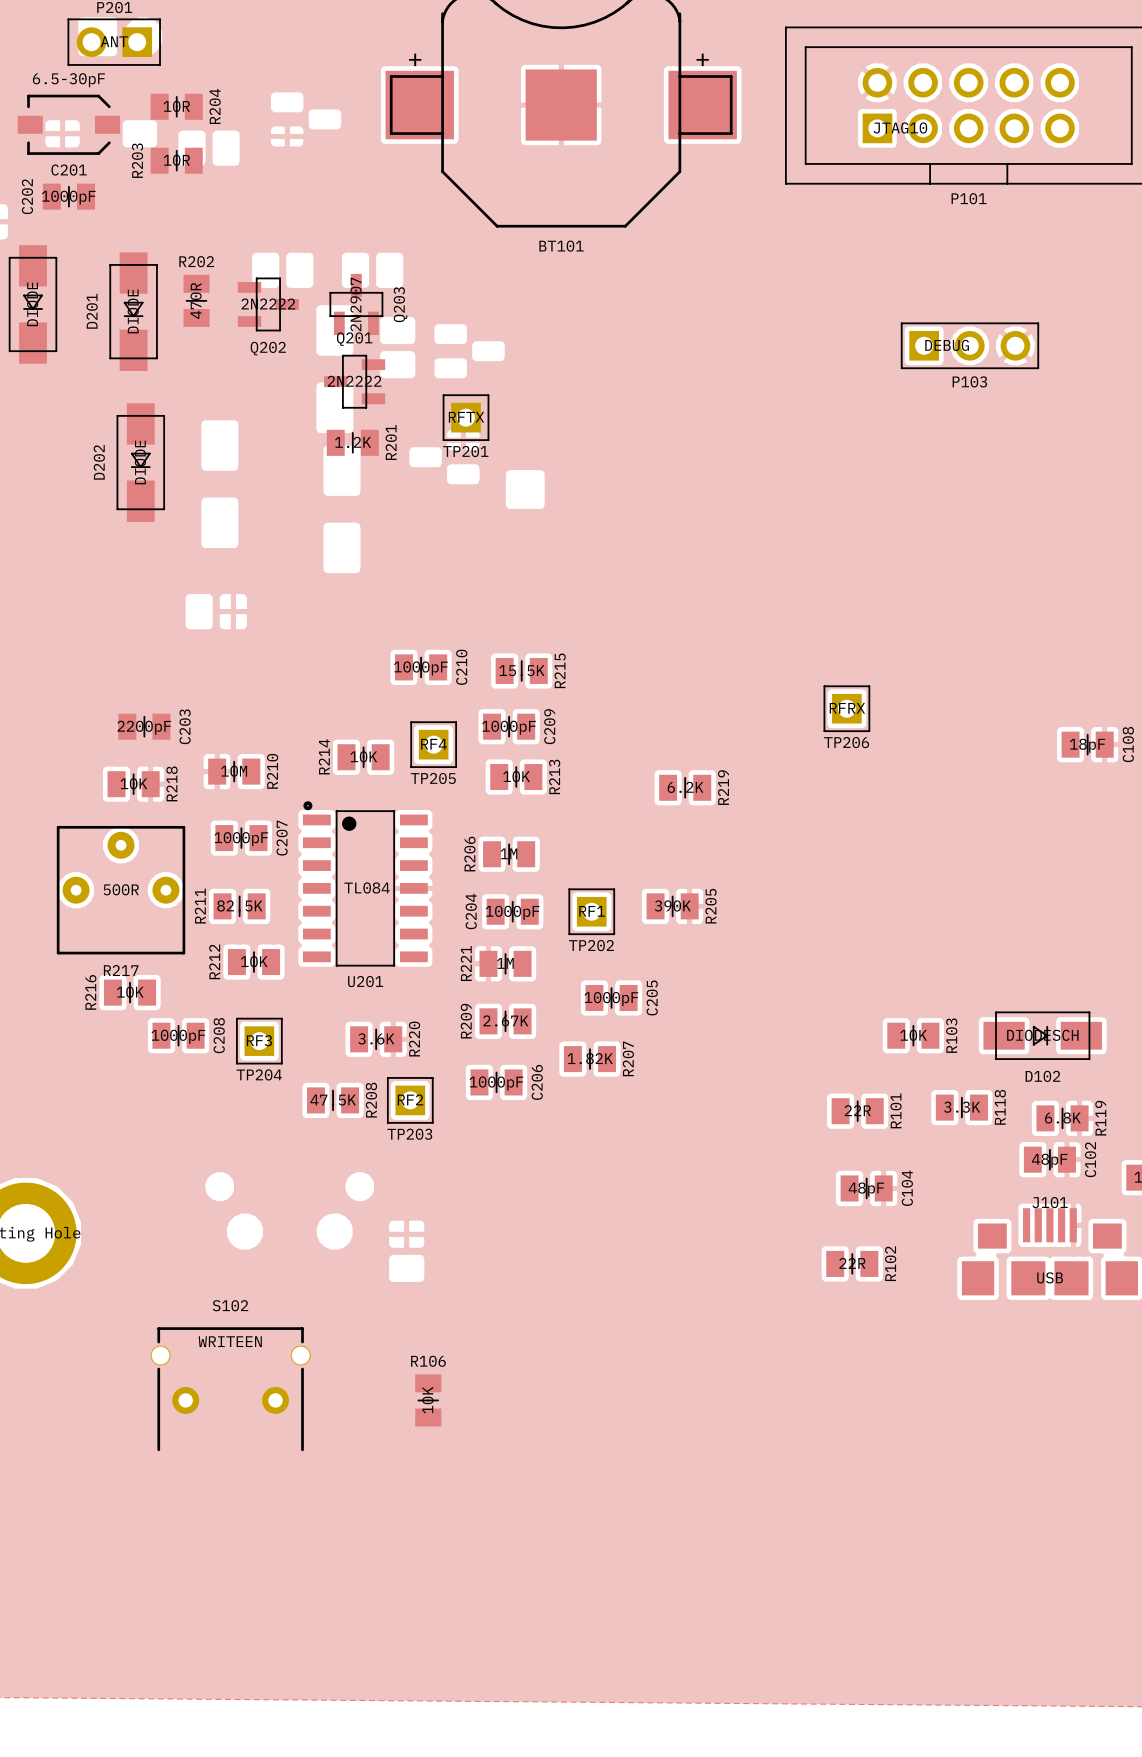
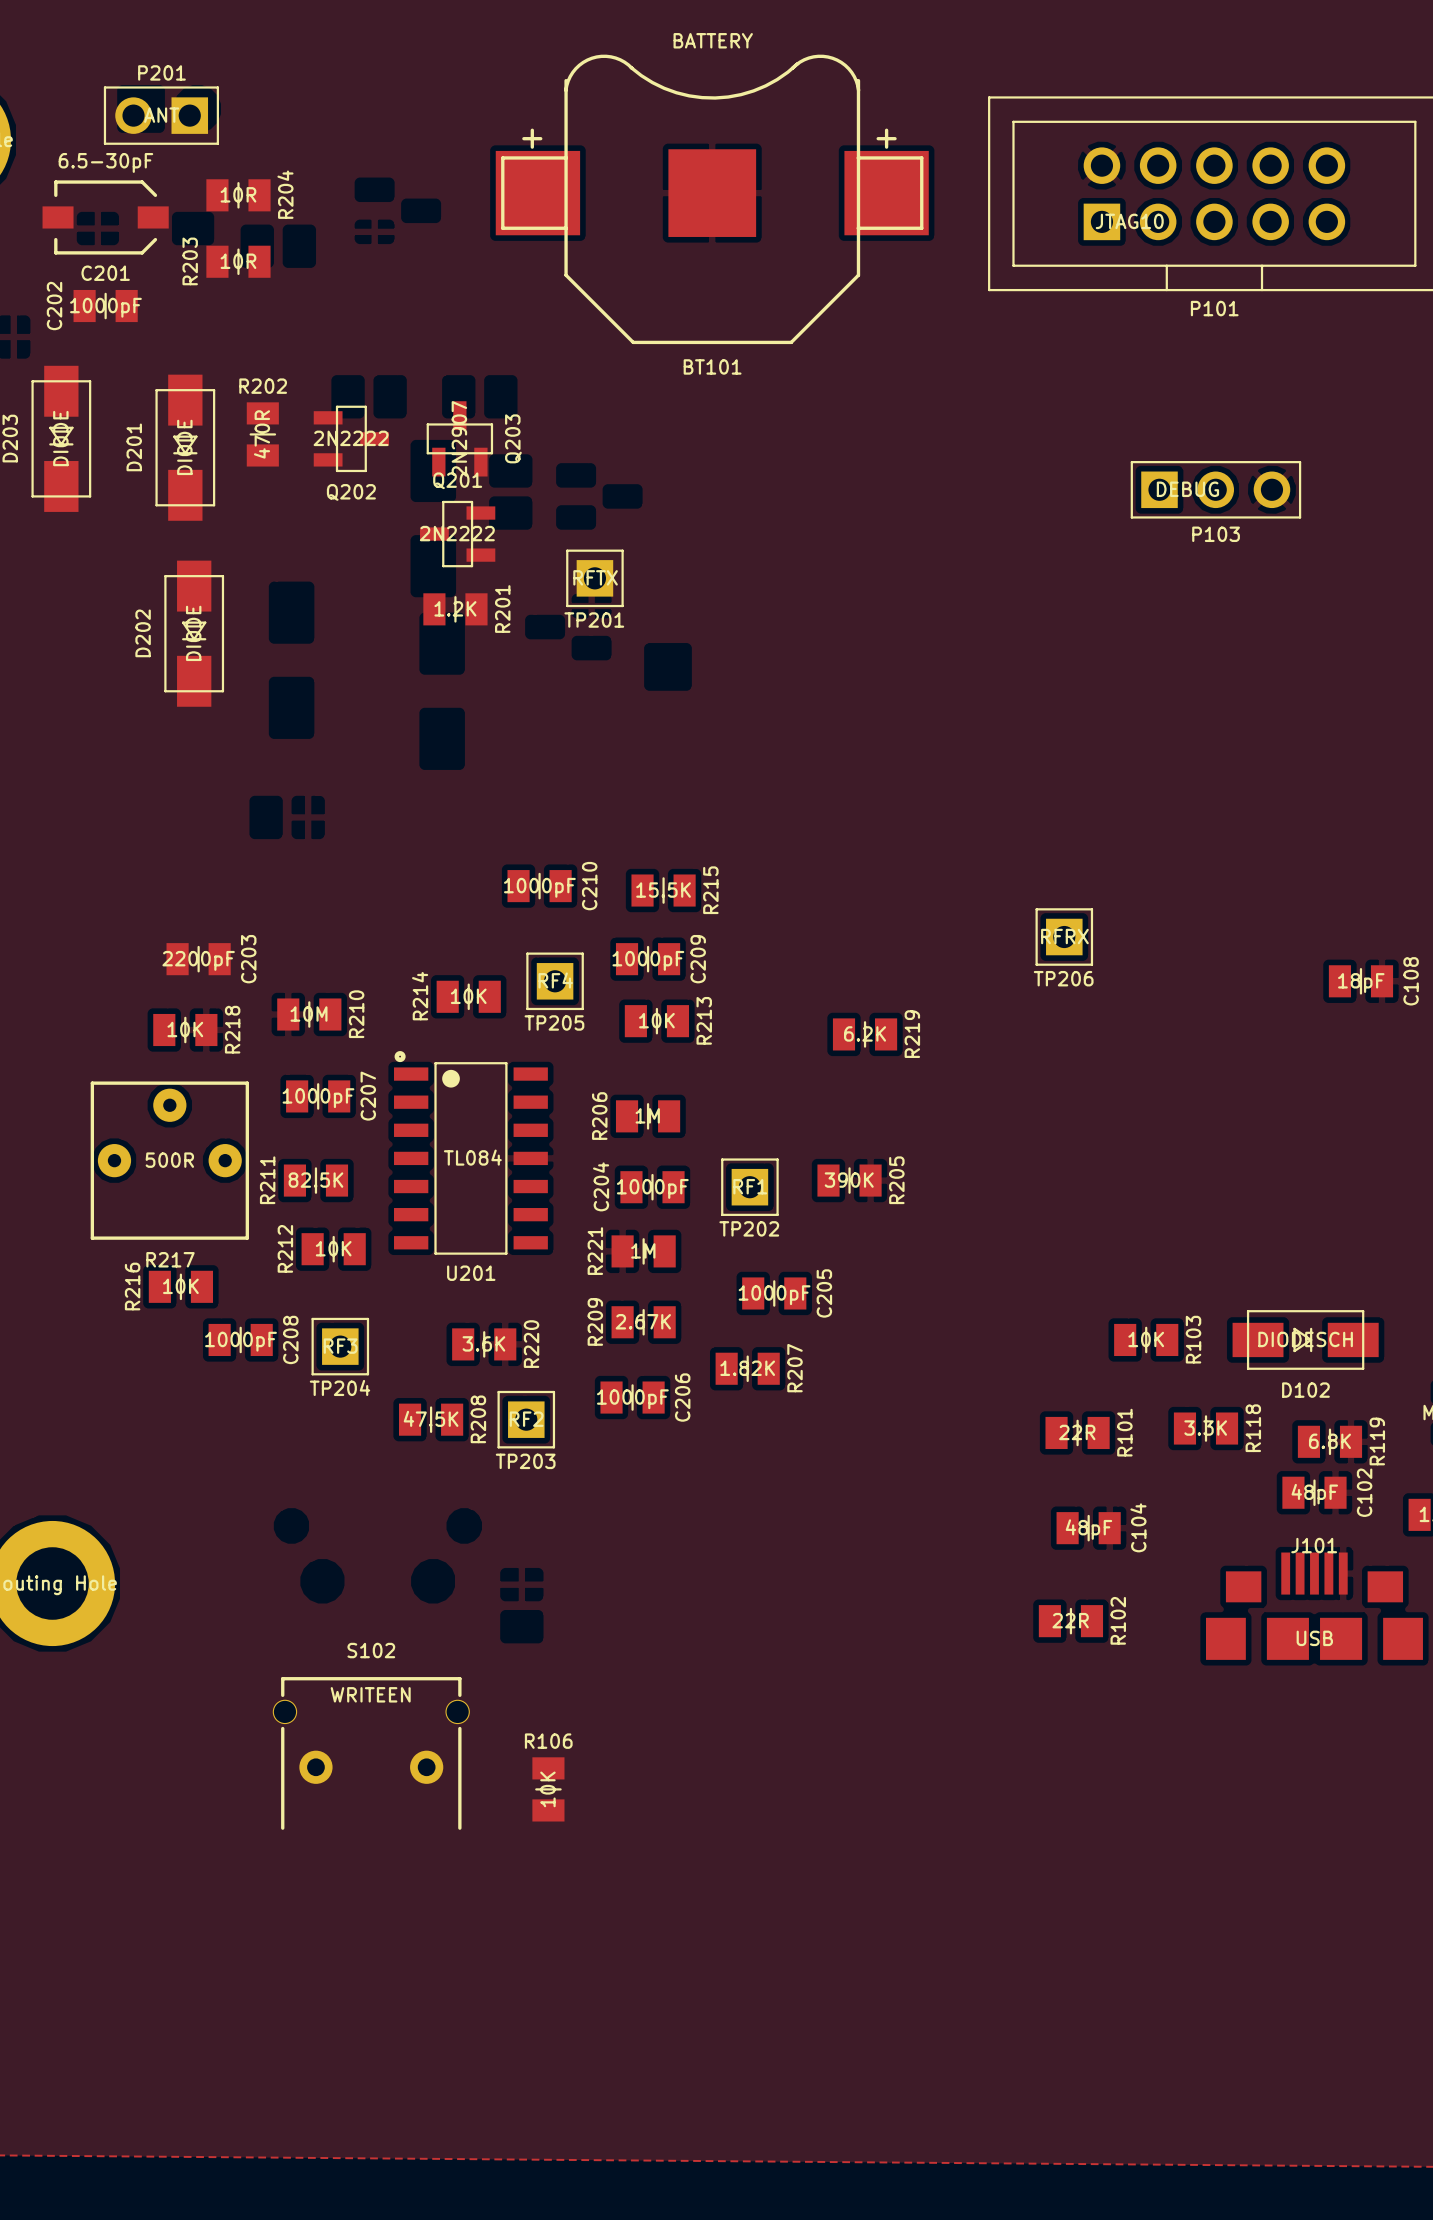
S102 position: (230, 1389) -> (371, 1753)

